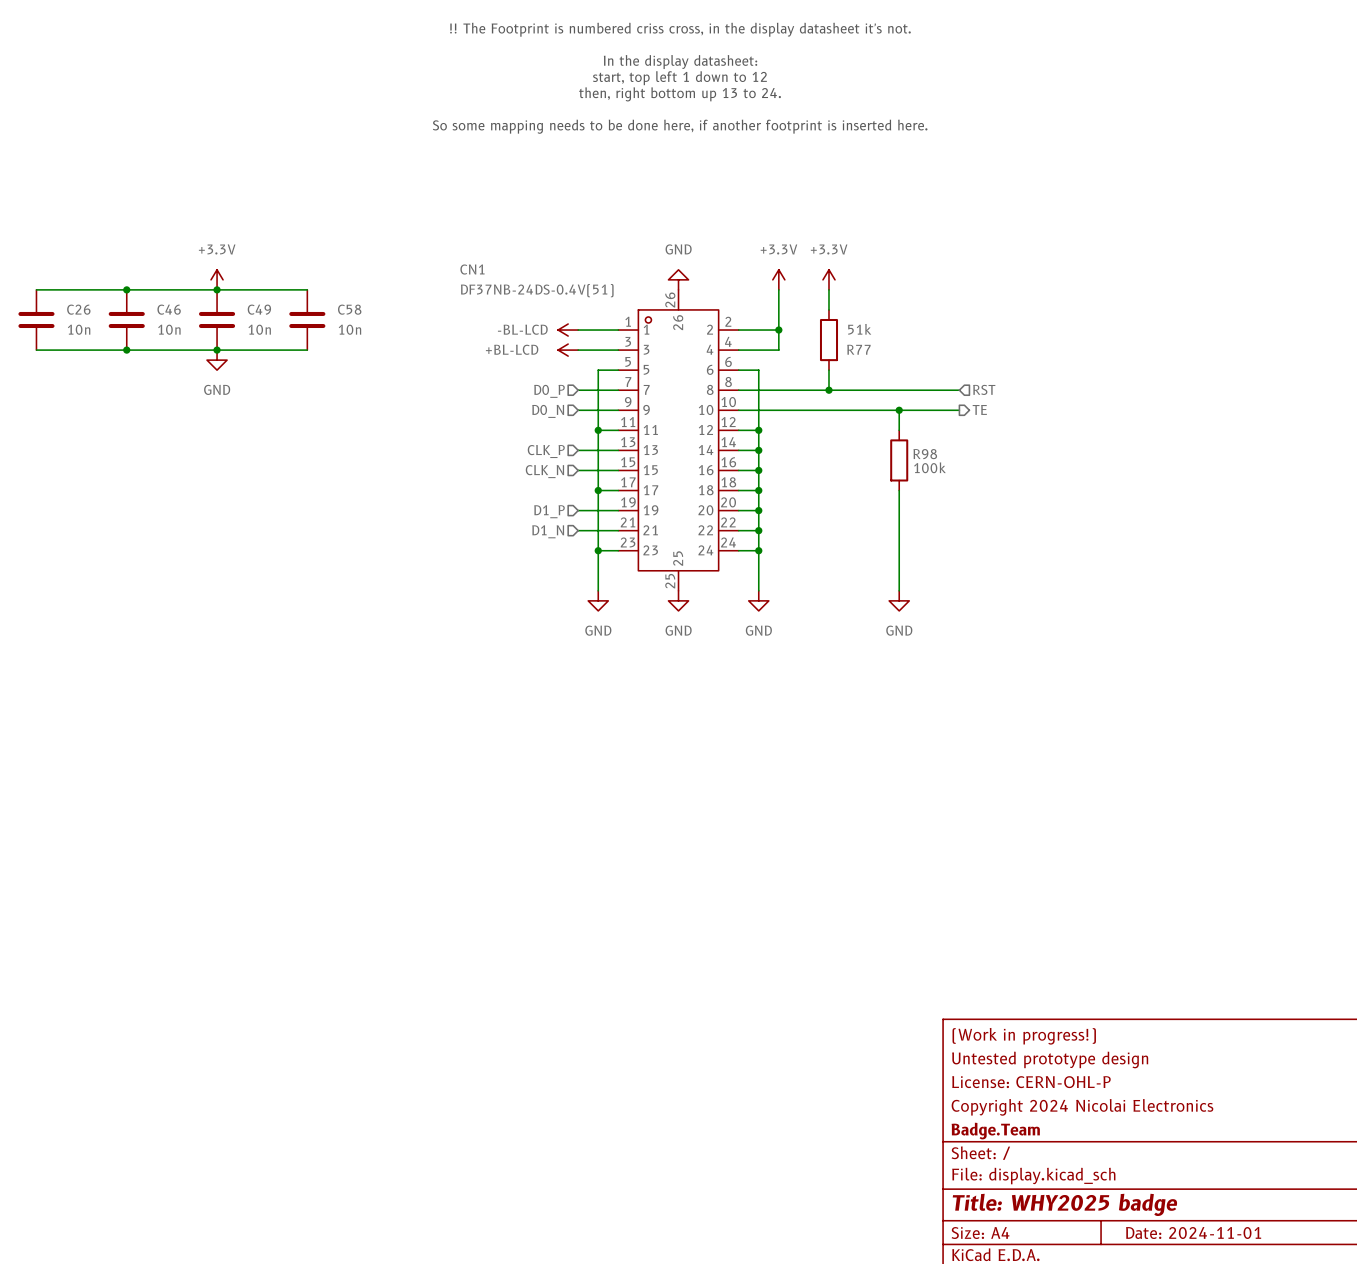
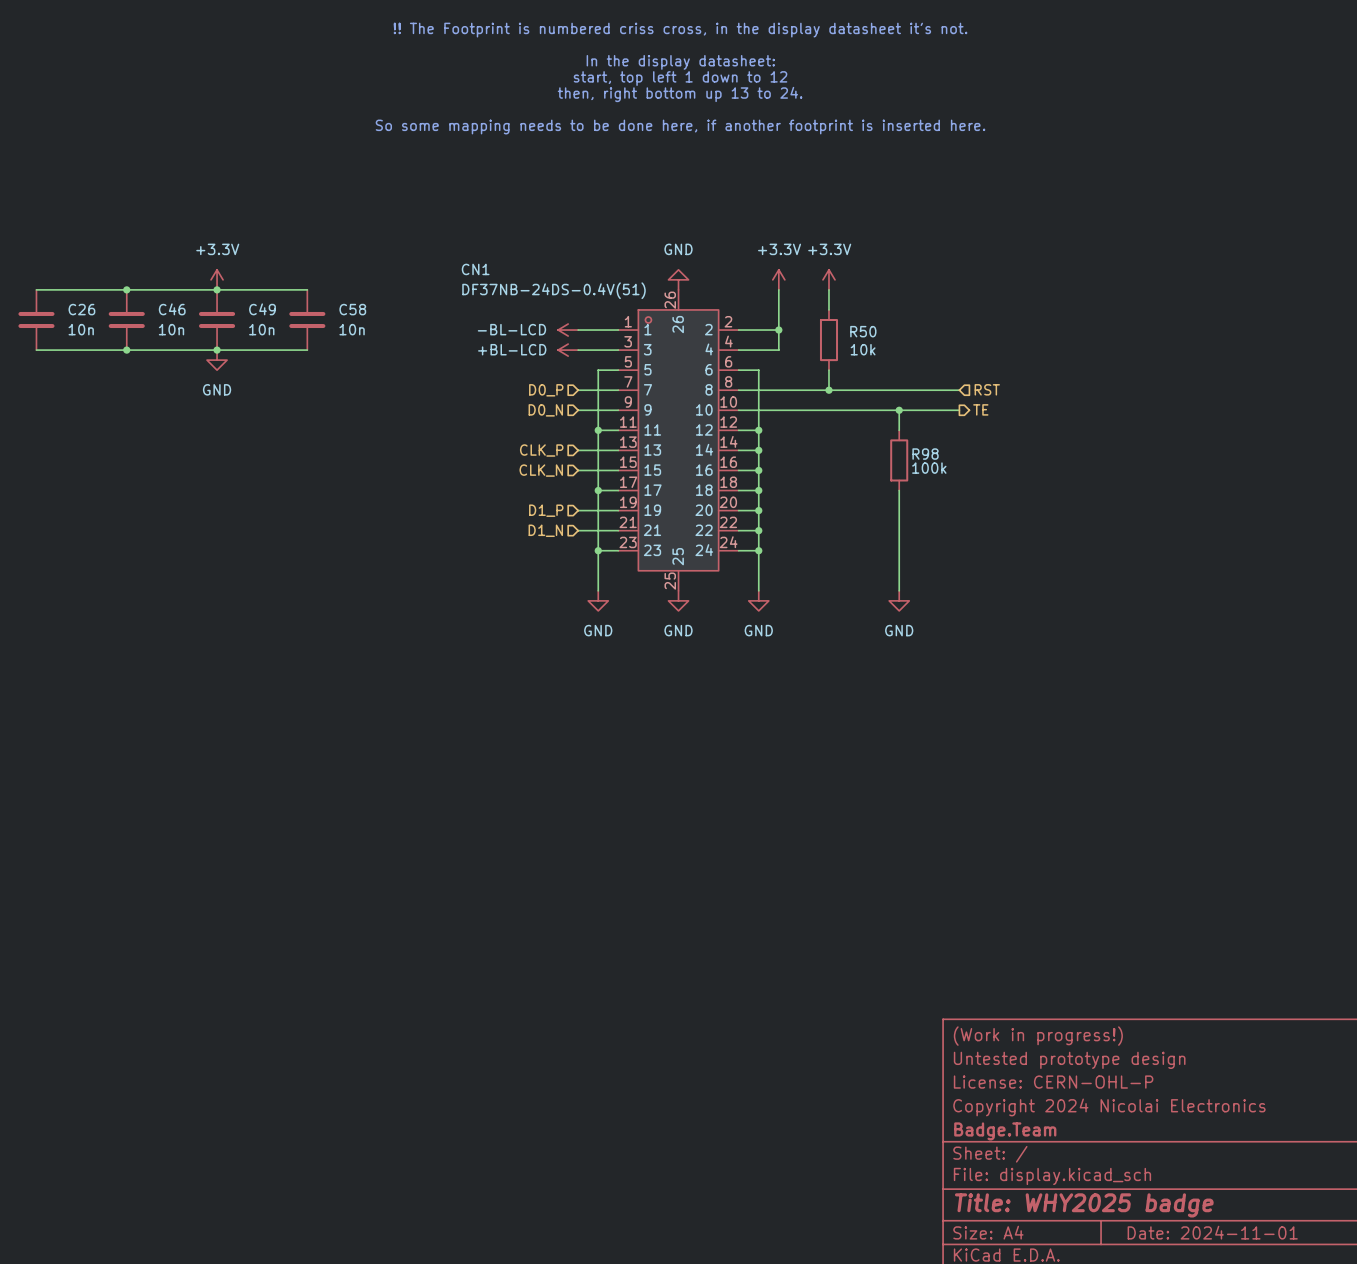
R77 value: 51k (859, 329) -> 10k (863, 349)
R77 name: R77 (858, 349) -> R50 (863, 331)

